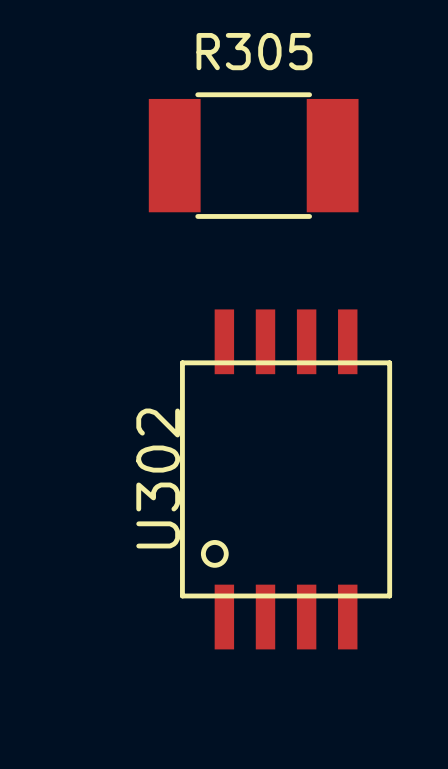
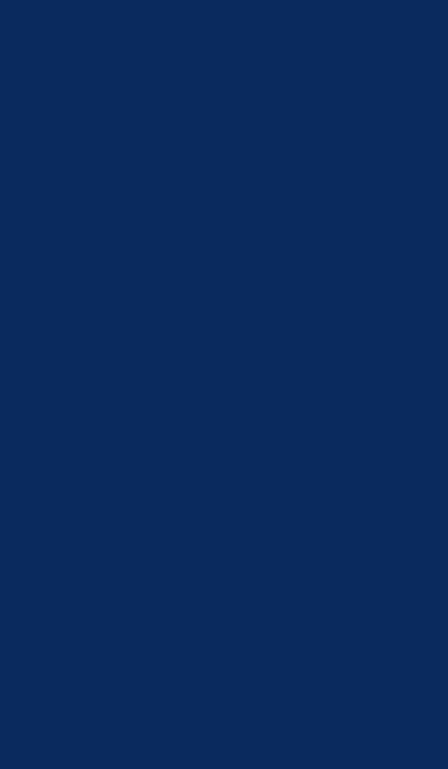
R305: (253, 155) -> none
U302: (286, 479) -> none

